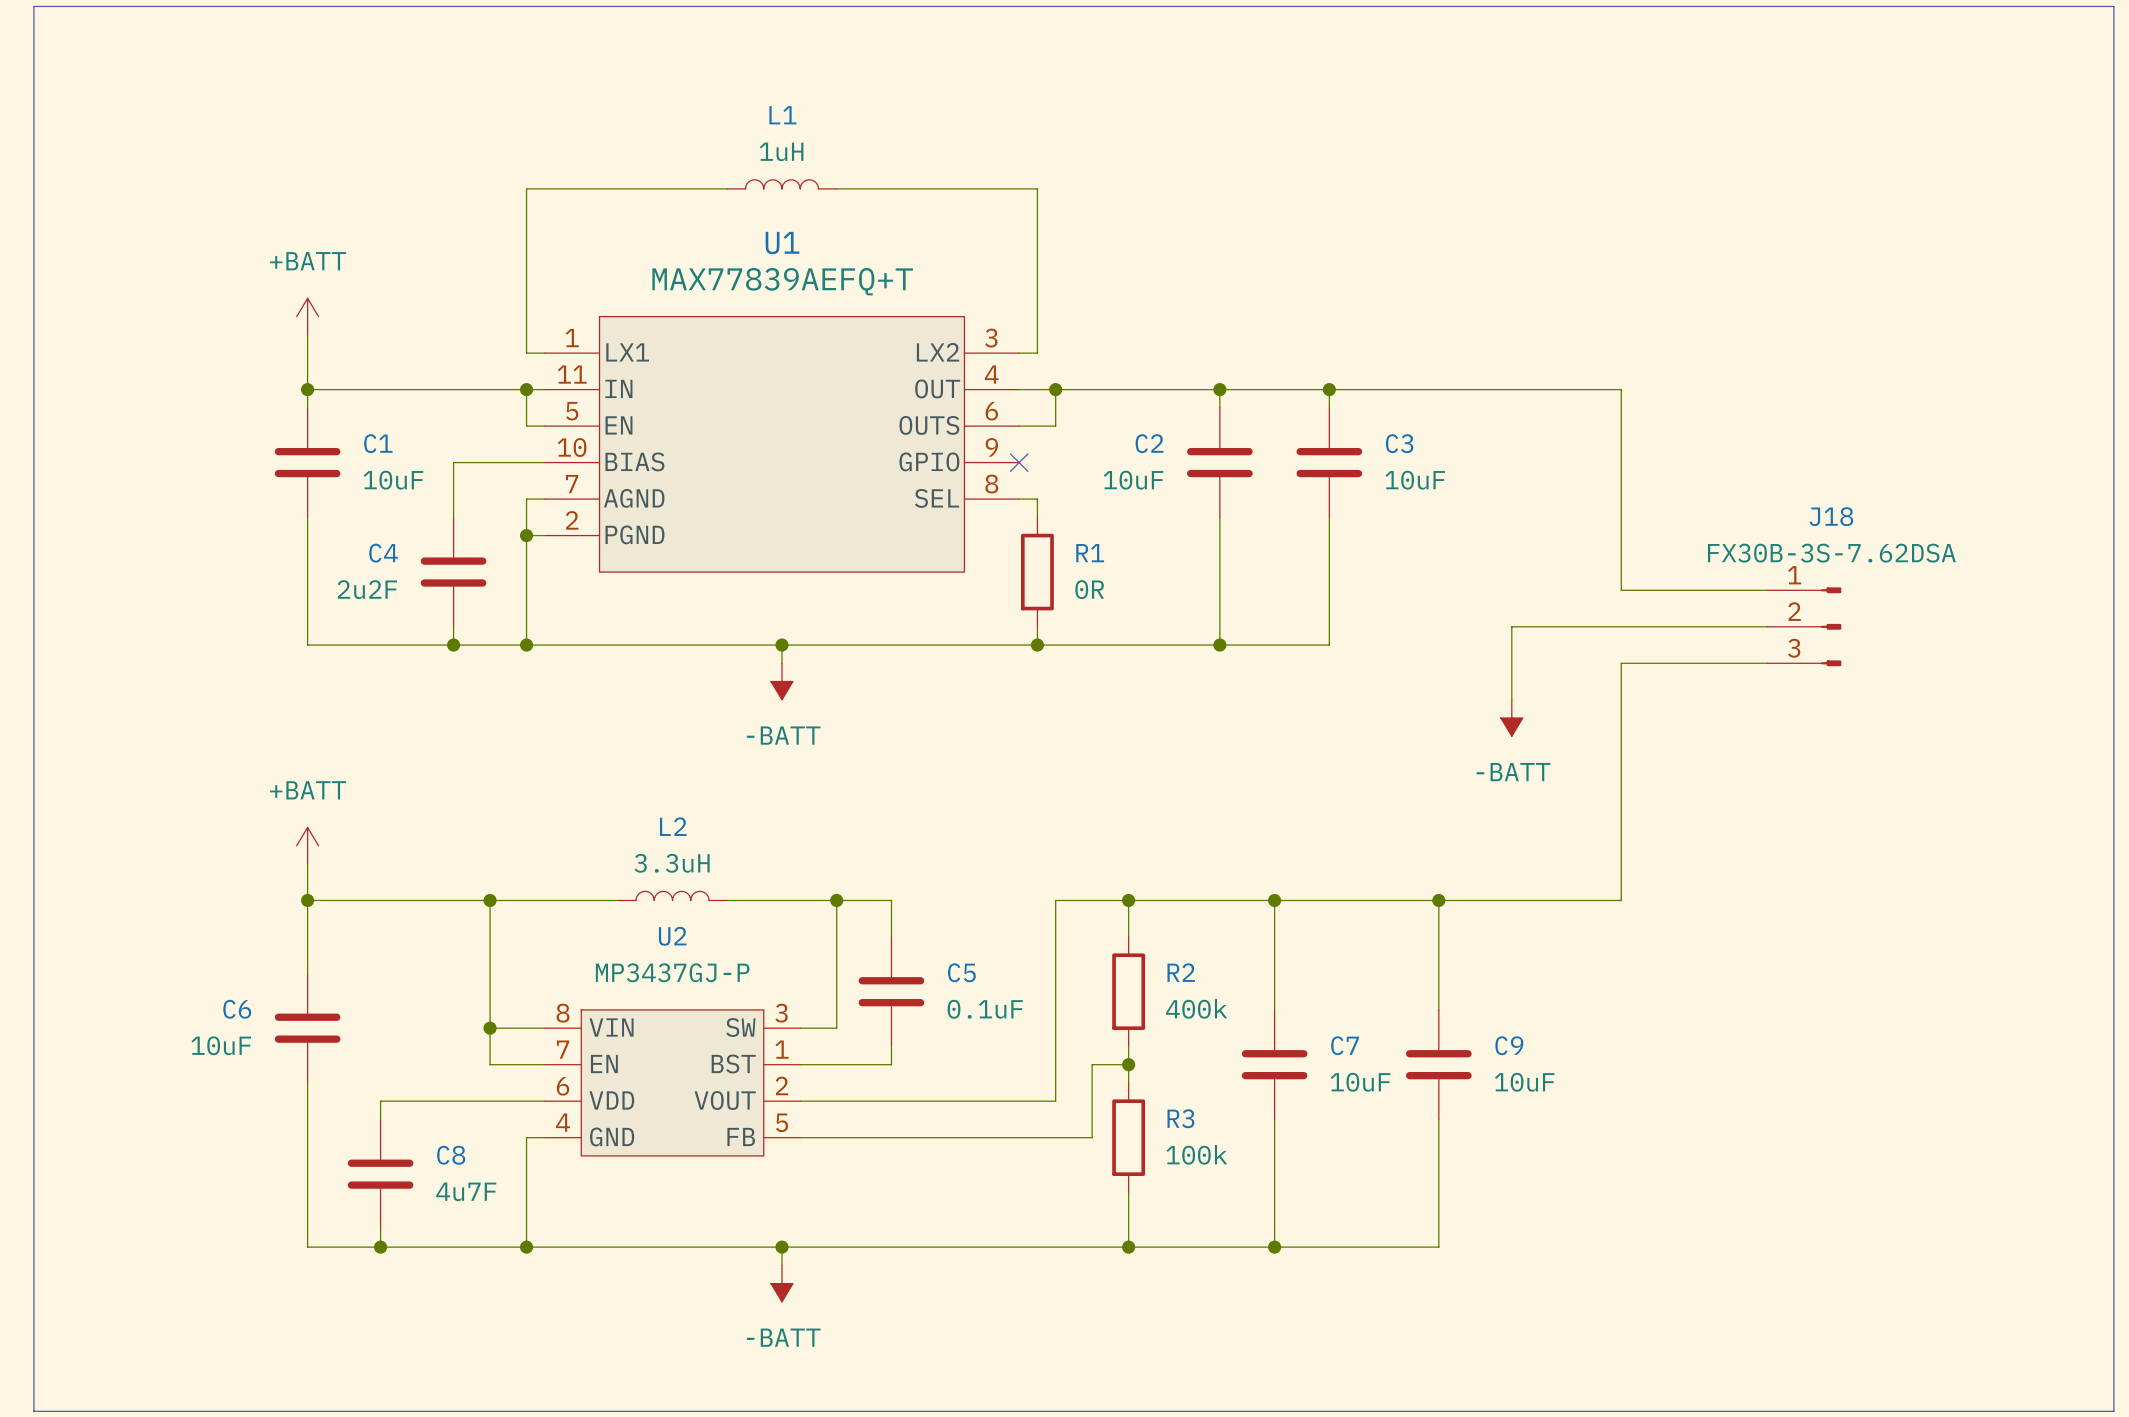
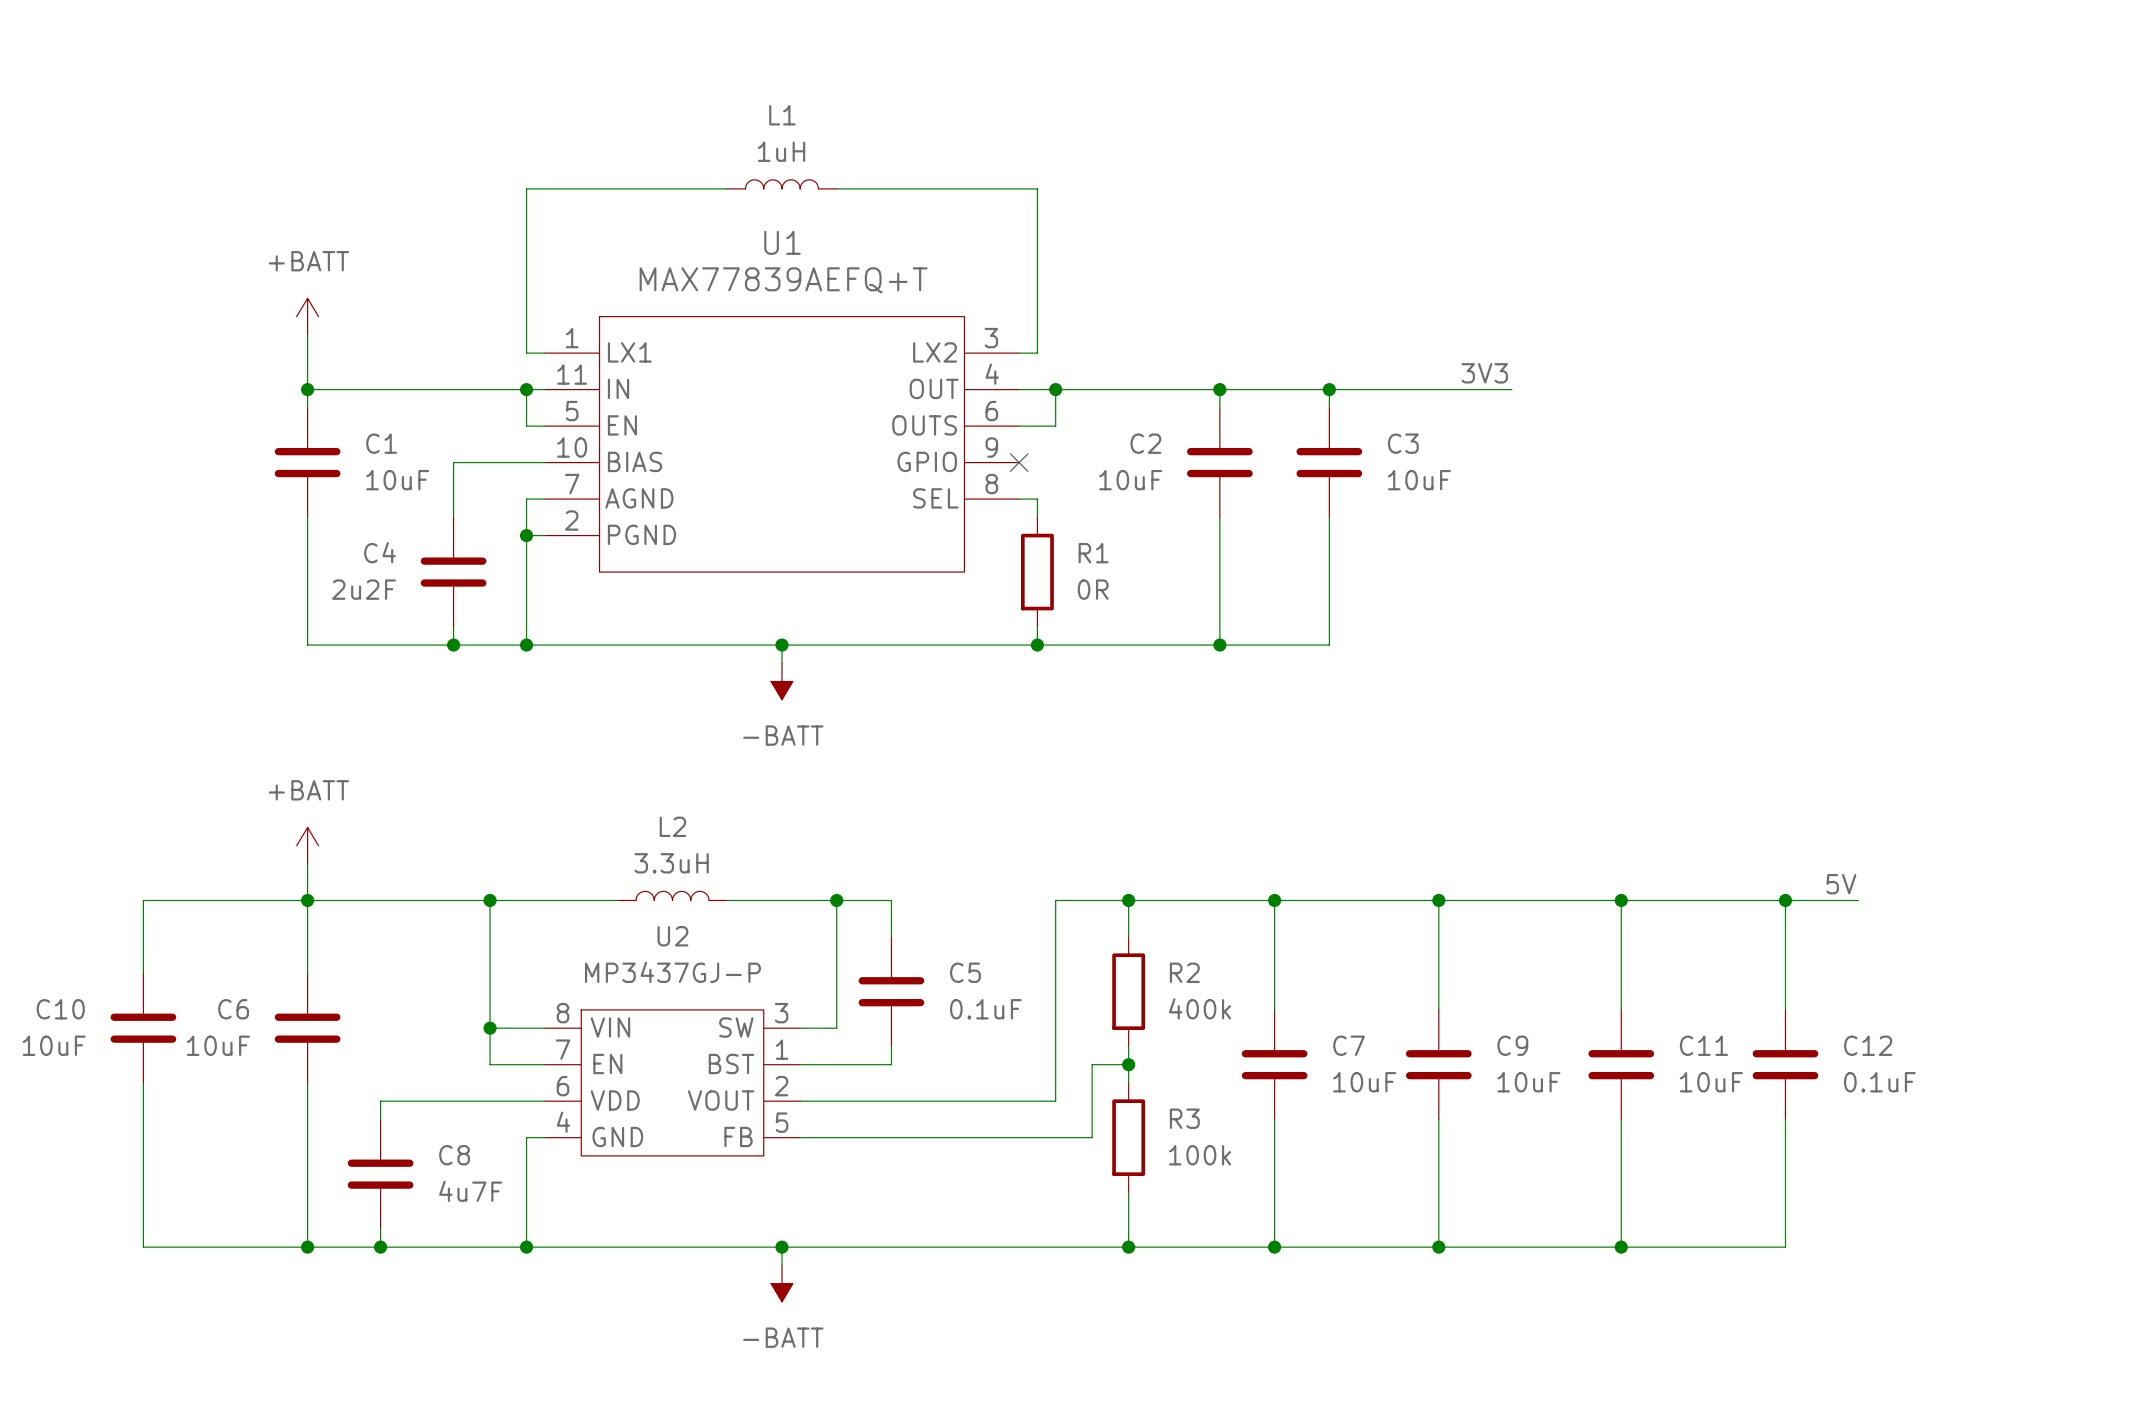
line: (33, 6) (2113, 6) (2113, 1411) (33, 1411) (33, 6) -> none
label: none -> 3V3 (1484, 373)
wire: (1511, 389) (1621, 389) (1621, 590) (1767, 590) -> none
wire: (1767, 626) (1511, 626) (1511, 699) -> none
J18: FX30B-3S-7.62DSA (1804, 626) -> none
wire: (1767, 663) (1621, 663) (1621, 900) -> none
power symbol: -BATT (1511, 718) -> none
label: none -> 5V (1841, 884)
wire: none -> (307, 900) (143, 900) (143, 973)
junction: none -> (1621, 900)
wire: none -> (1785, 900) (1785, 1009)
junction: none -> (1785, 900)
wire: none -> (1858, 900) (1621, 900) (1621, 1009)
C10: none -> 10uF (143, 1028)
C11: none -> 10uF (1621, 1064)
C12: none -> 0.1uF (1785, 1064)
wire: none -> (143, 1082) (143, 1247) (307, 1247)
wire: none -> (1621, 1119) (1621, 1247)
wire: none -> (1785, 1119) (1785, 1247) (1438, 1247)
junction: none -> (307, 1247)
junction: none -> (1438, 1247)
junction: none -> (1621, 1247)

